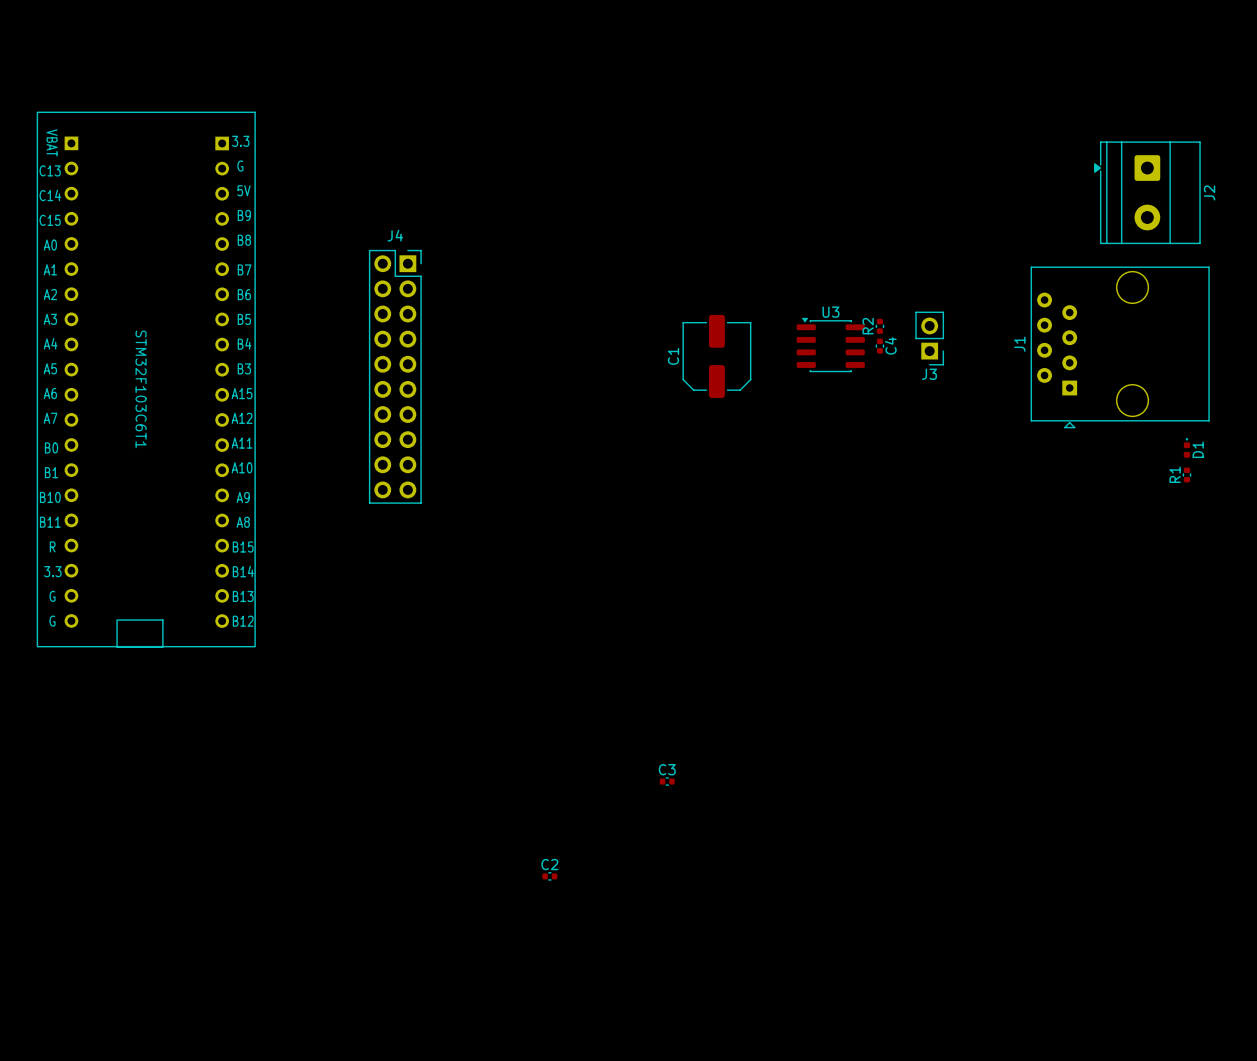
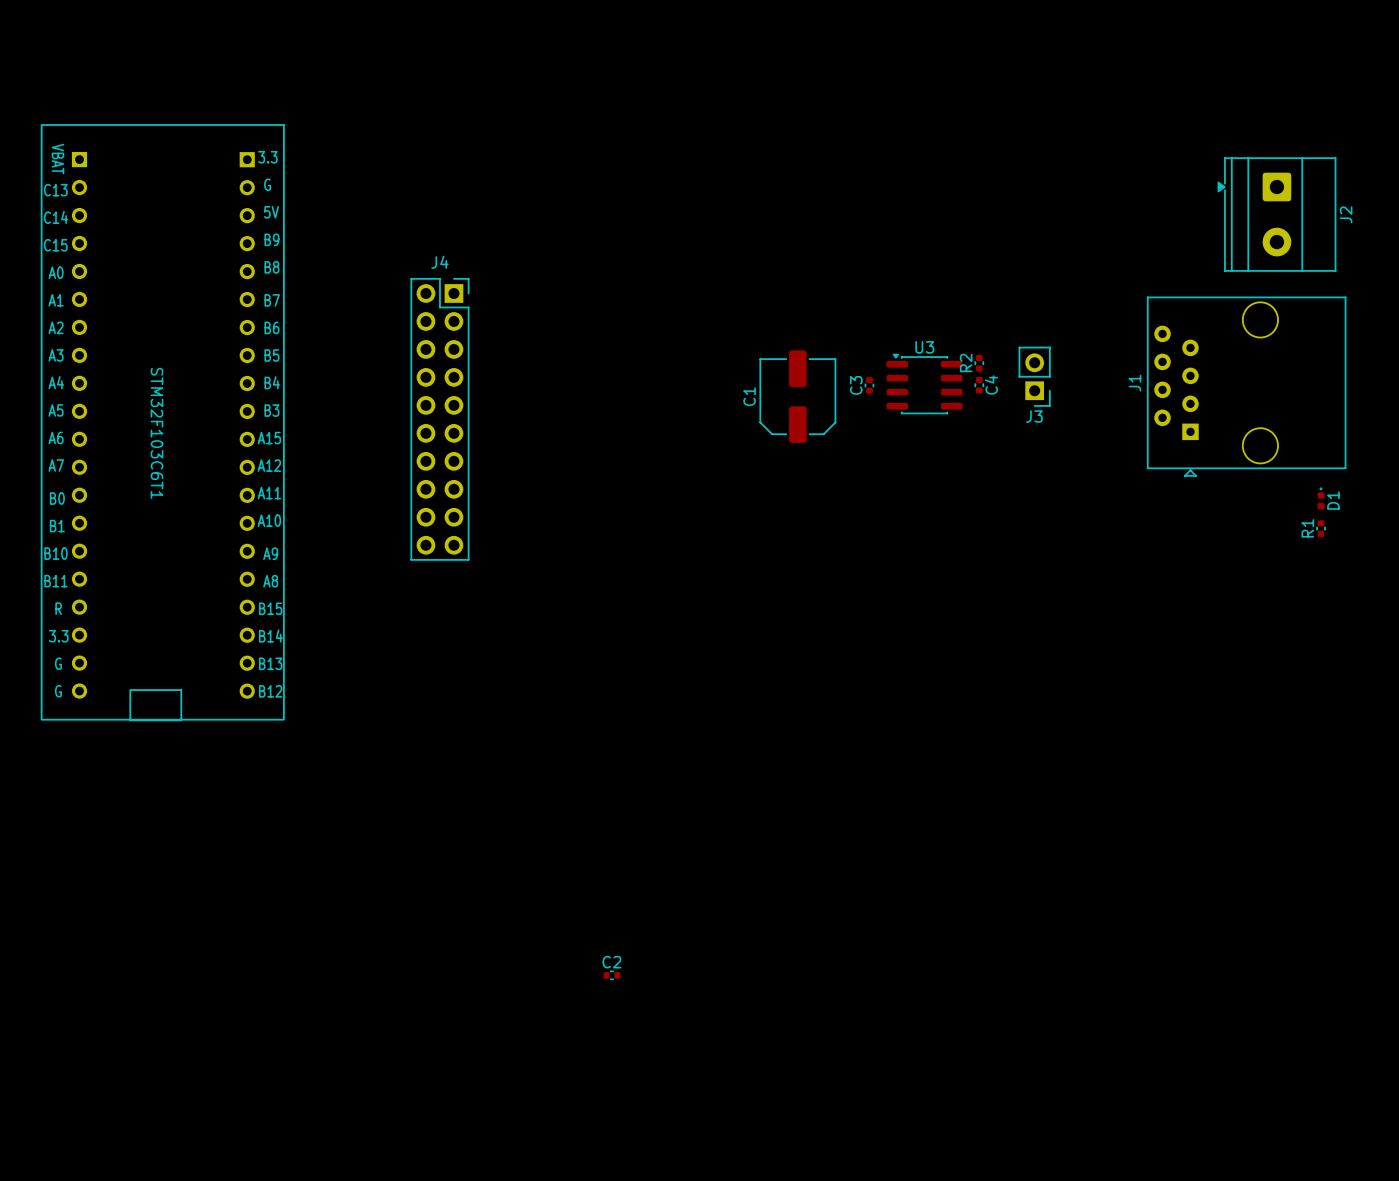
C3 rotation: 0° (667, 781) -> 90° clockwise (869, 385)
C3 position: (667, 781) -> (869, 385)

